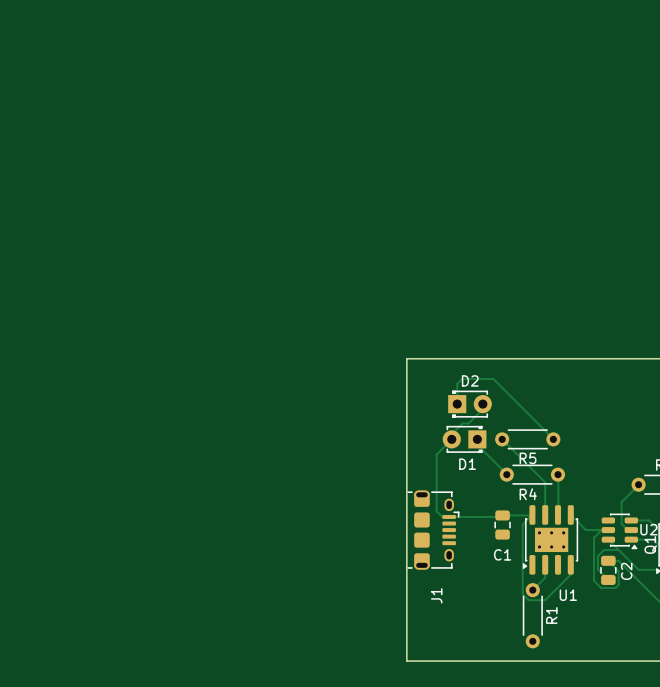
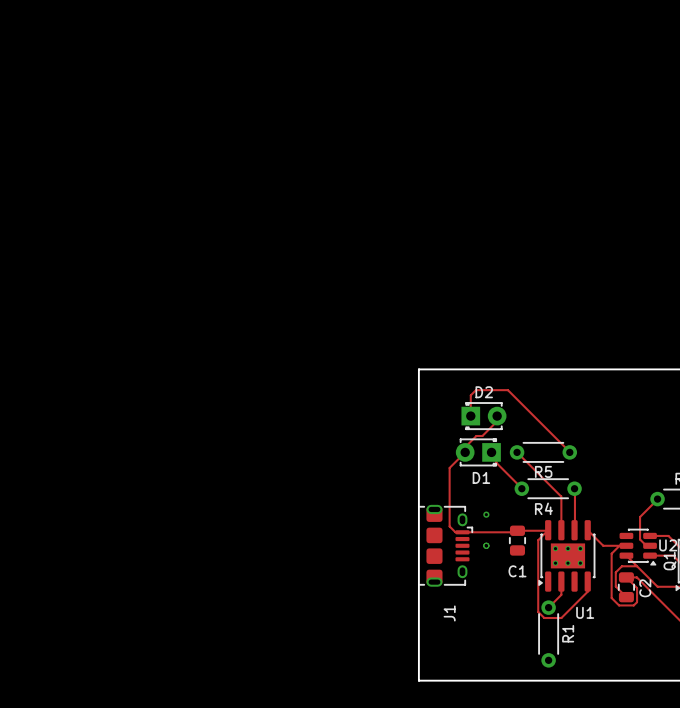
via: none -> (486, 514)
via: none -> (486, 545)

